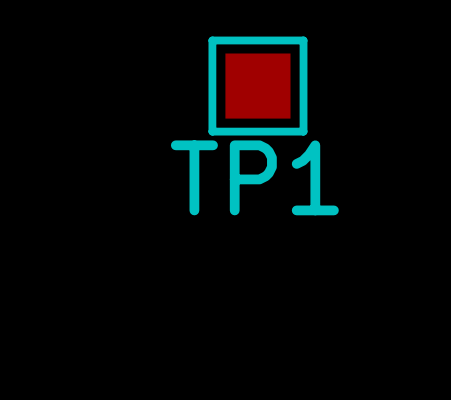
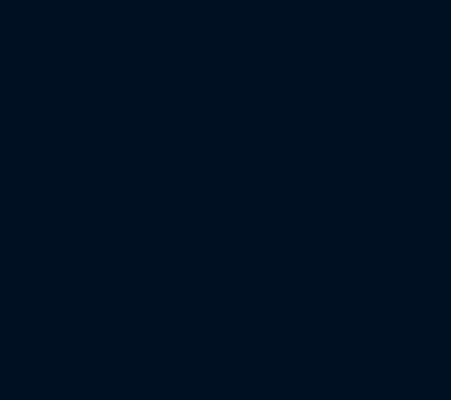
TP1: (257, 86) -> none

